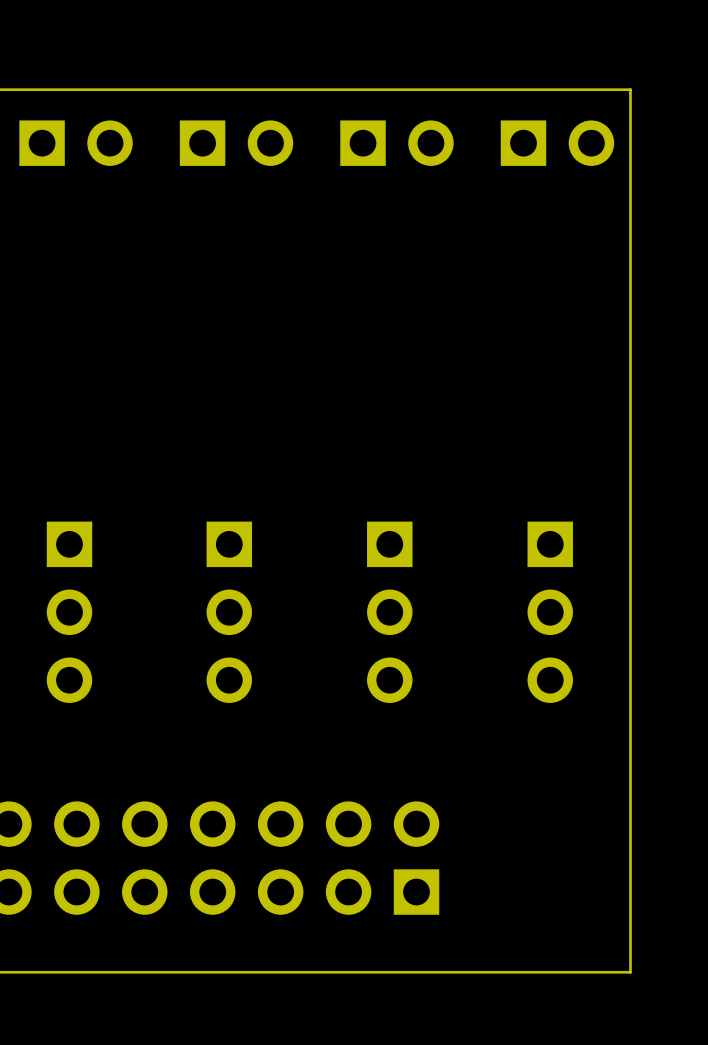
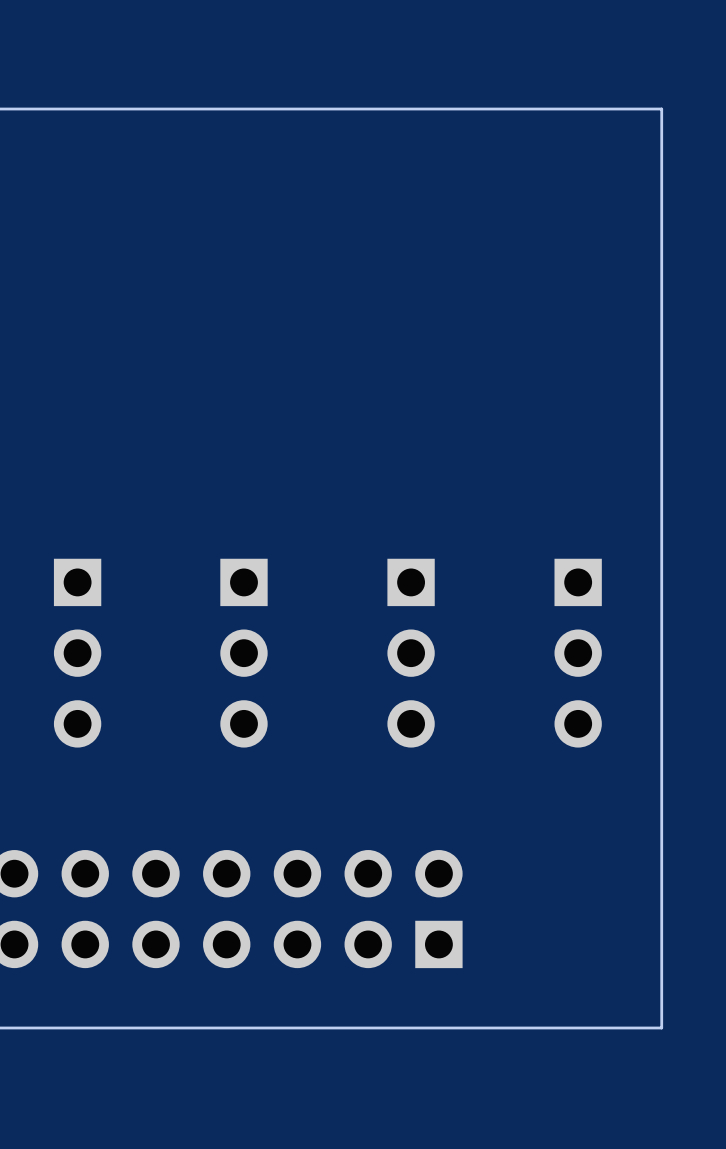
part: (76, 143) -> none
part: (236, 143) -> none
part: (396, 143) -> none
part: (557, 143) -> none

